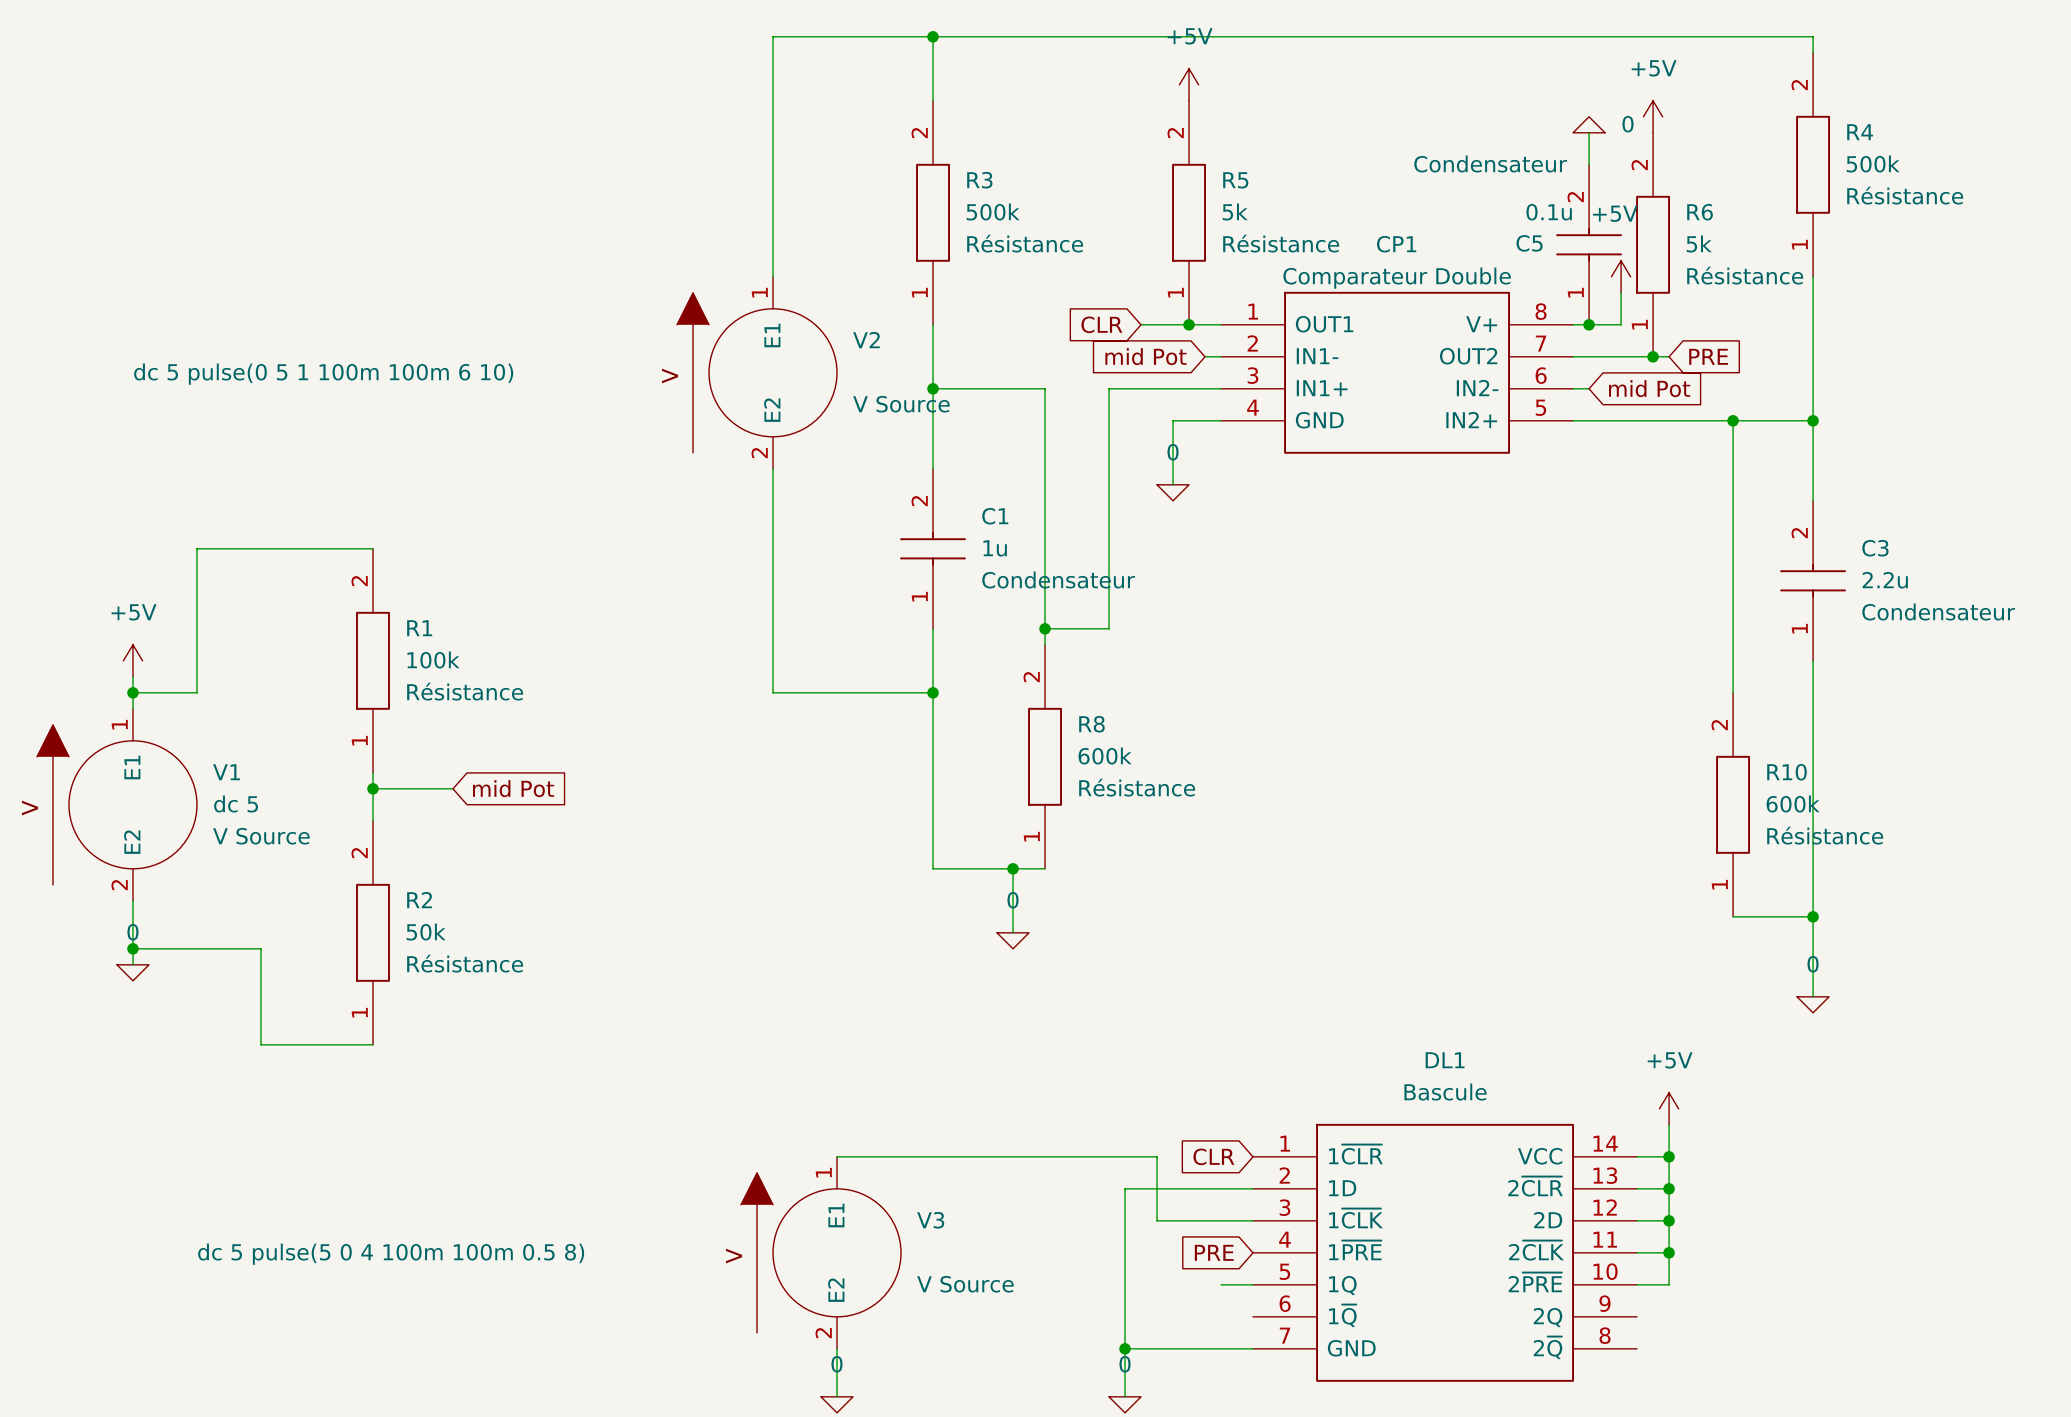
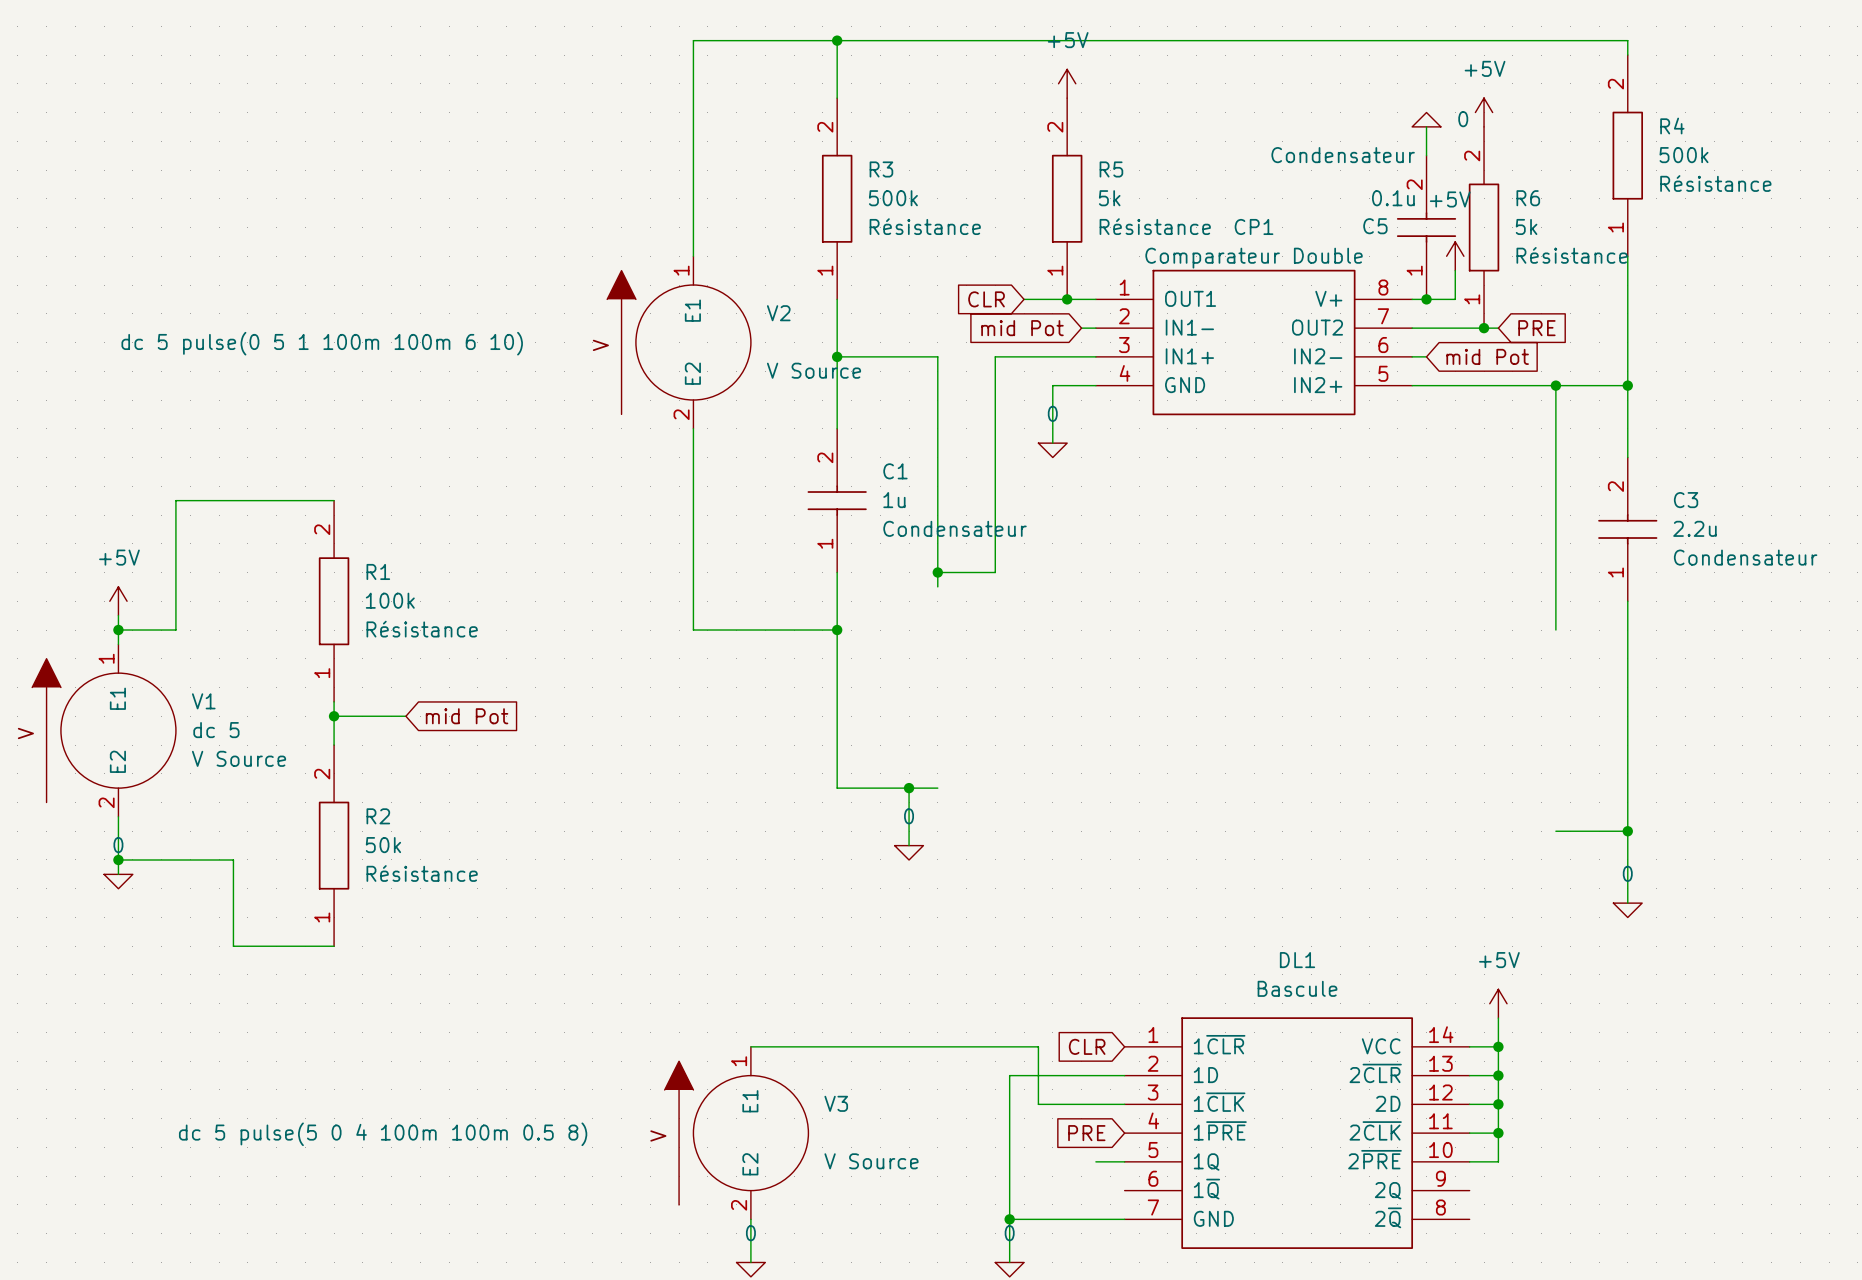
R8: (1045, 756) -> none
R10: (1733, 804) -> none

